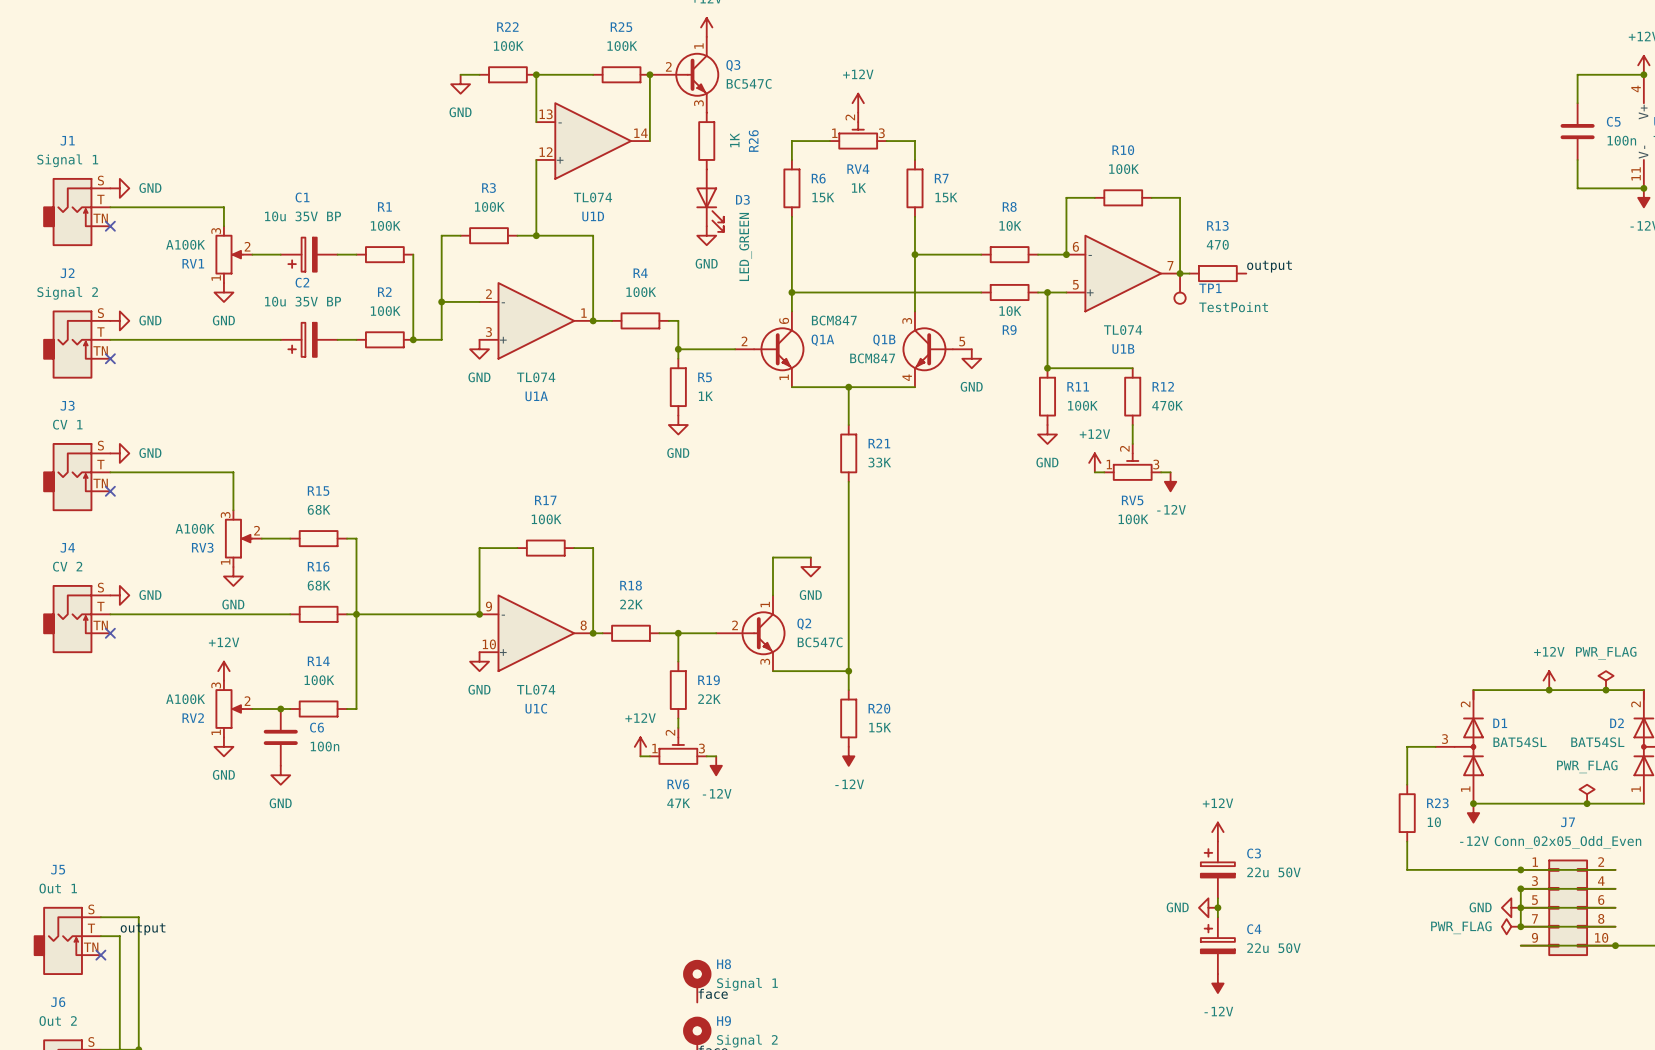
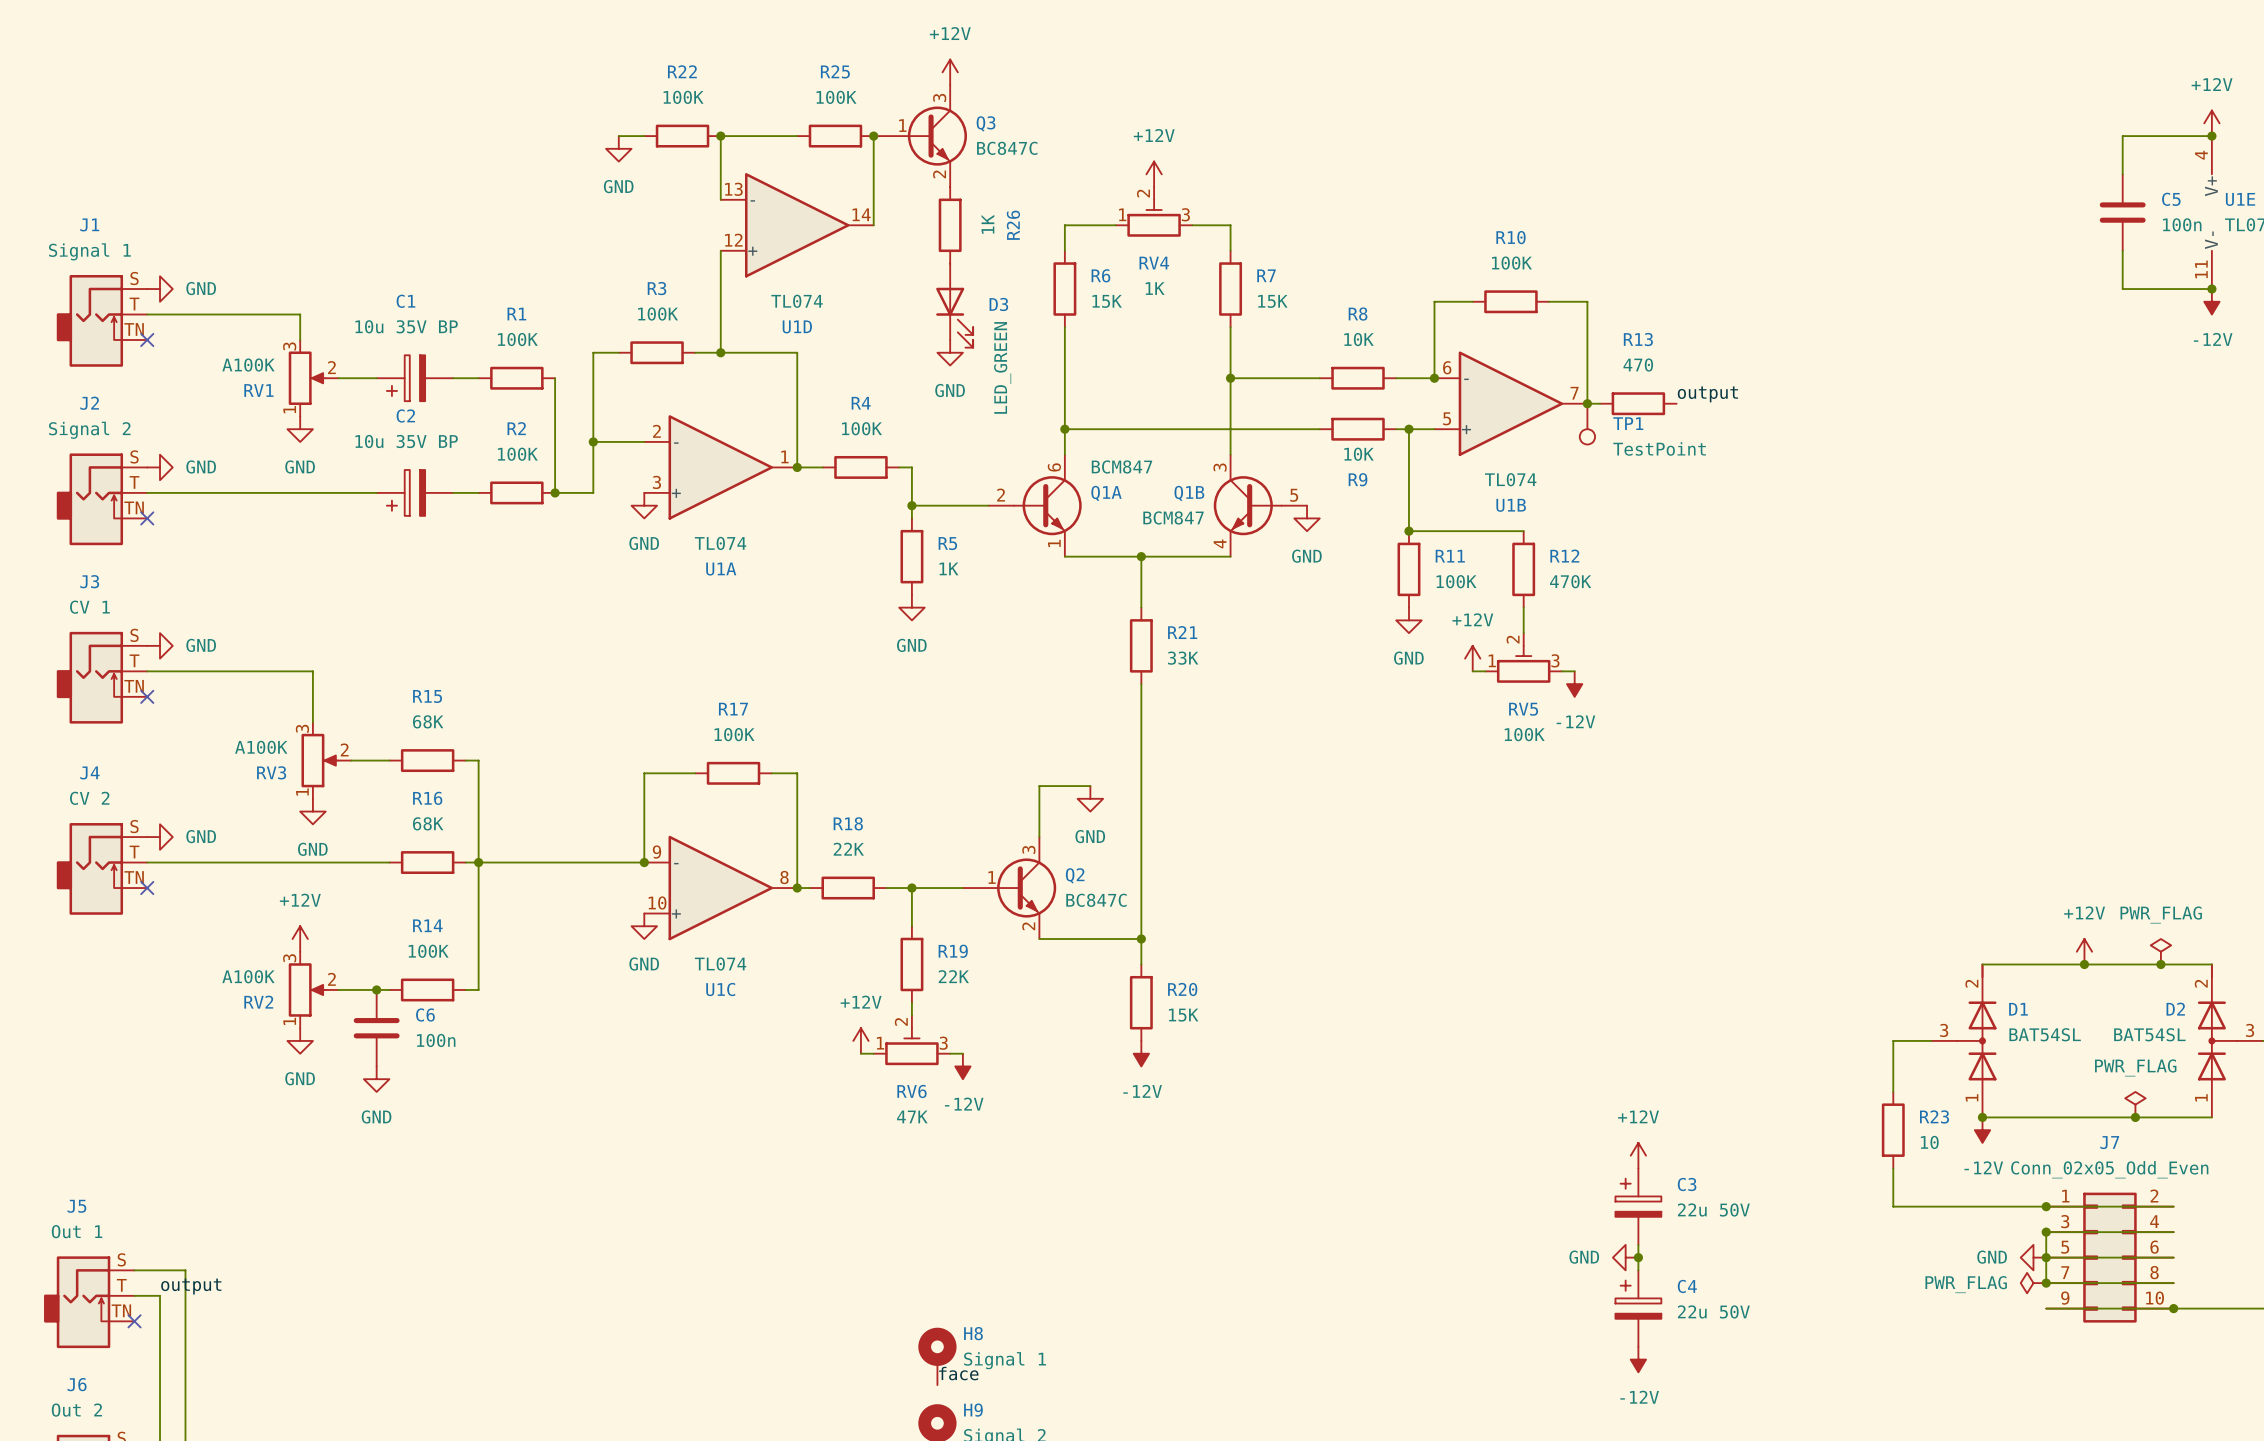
Q3 symbol: [649, 36, 720, 113] -> [873, 85, 968, 188]
Q3 value: BC547C (749, 83) -> BC847C (1007, 148)
Q2 symbol: [716, 595, 786, 672] -> [962, 837, 1057, 940]
Q2 value: BC547C (820, 642) -> BC847C (1096, 900)

